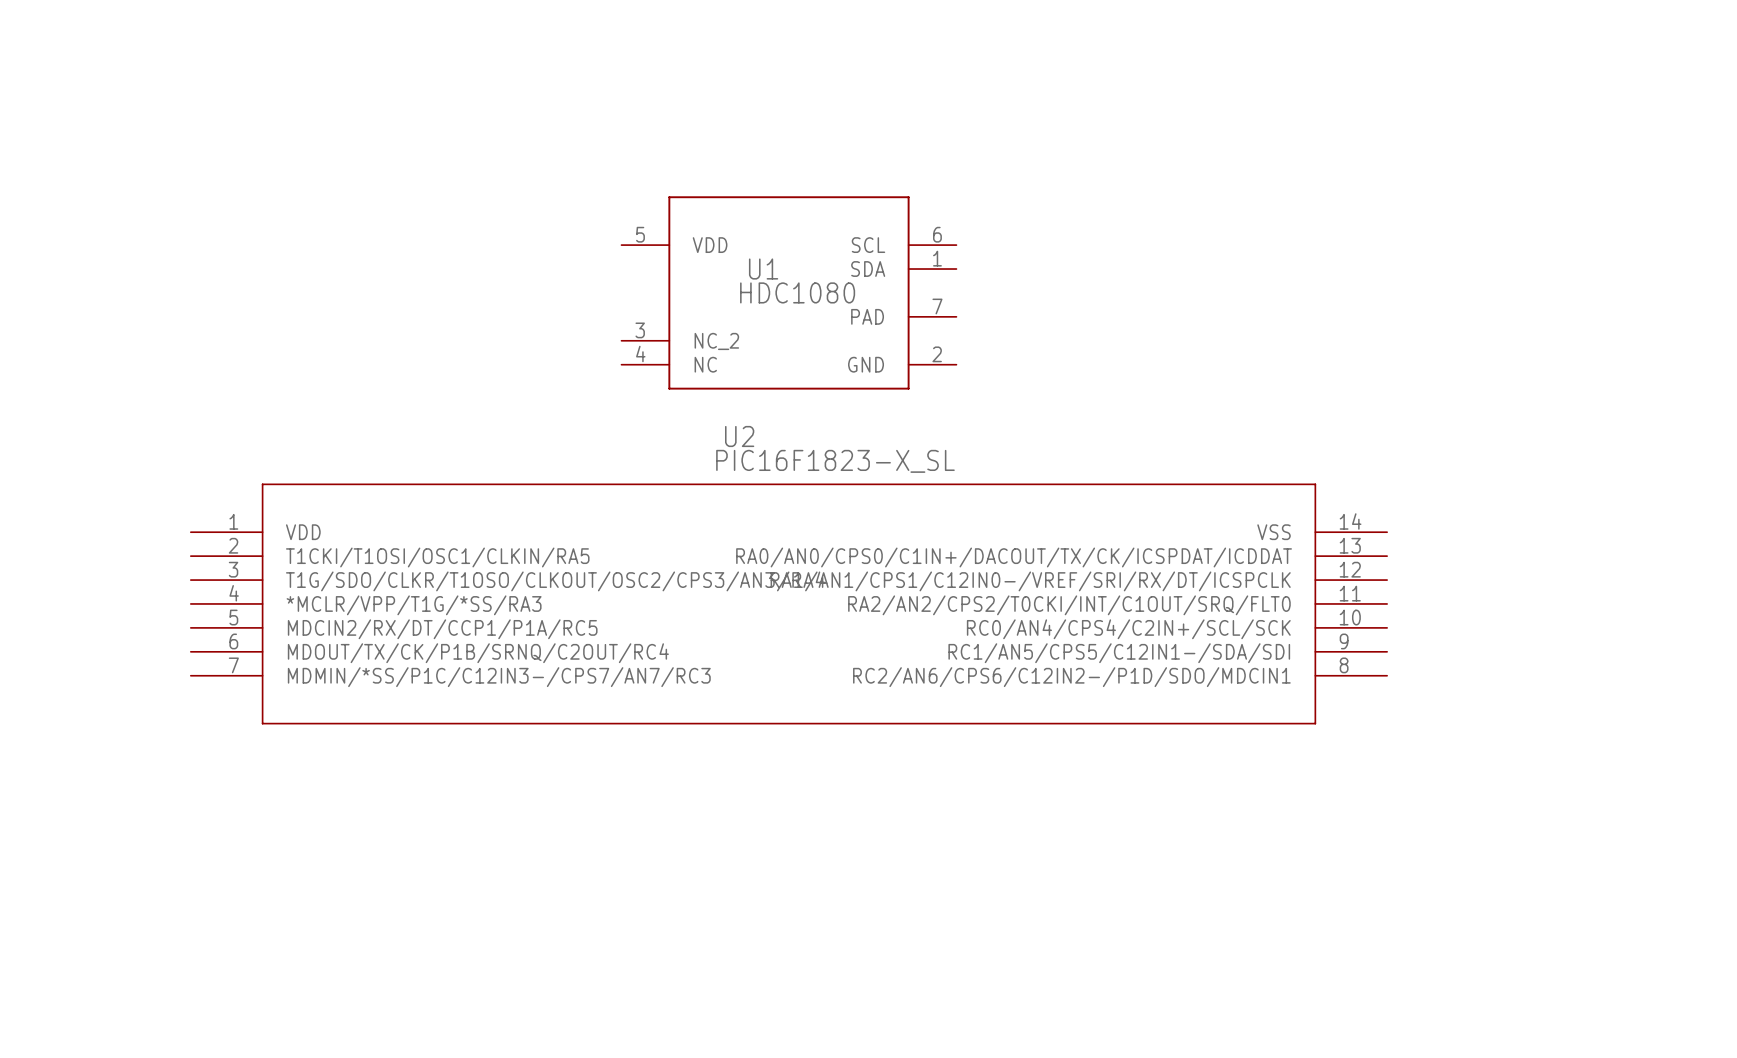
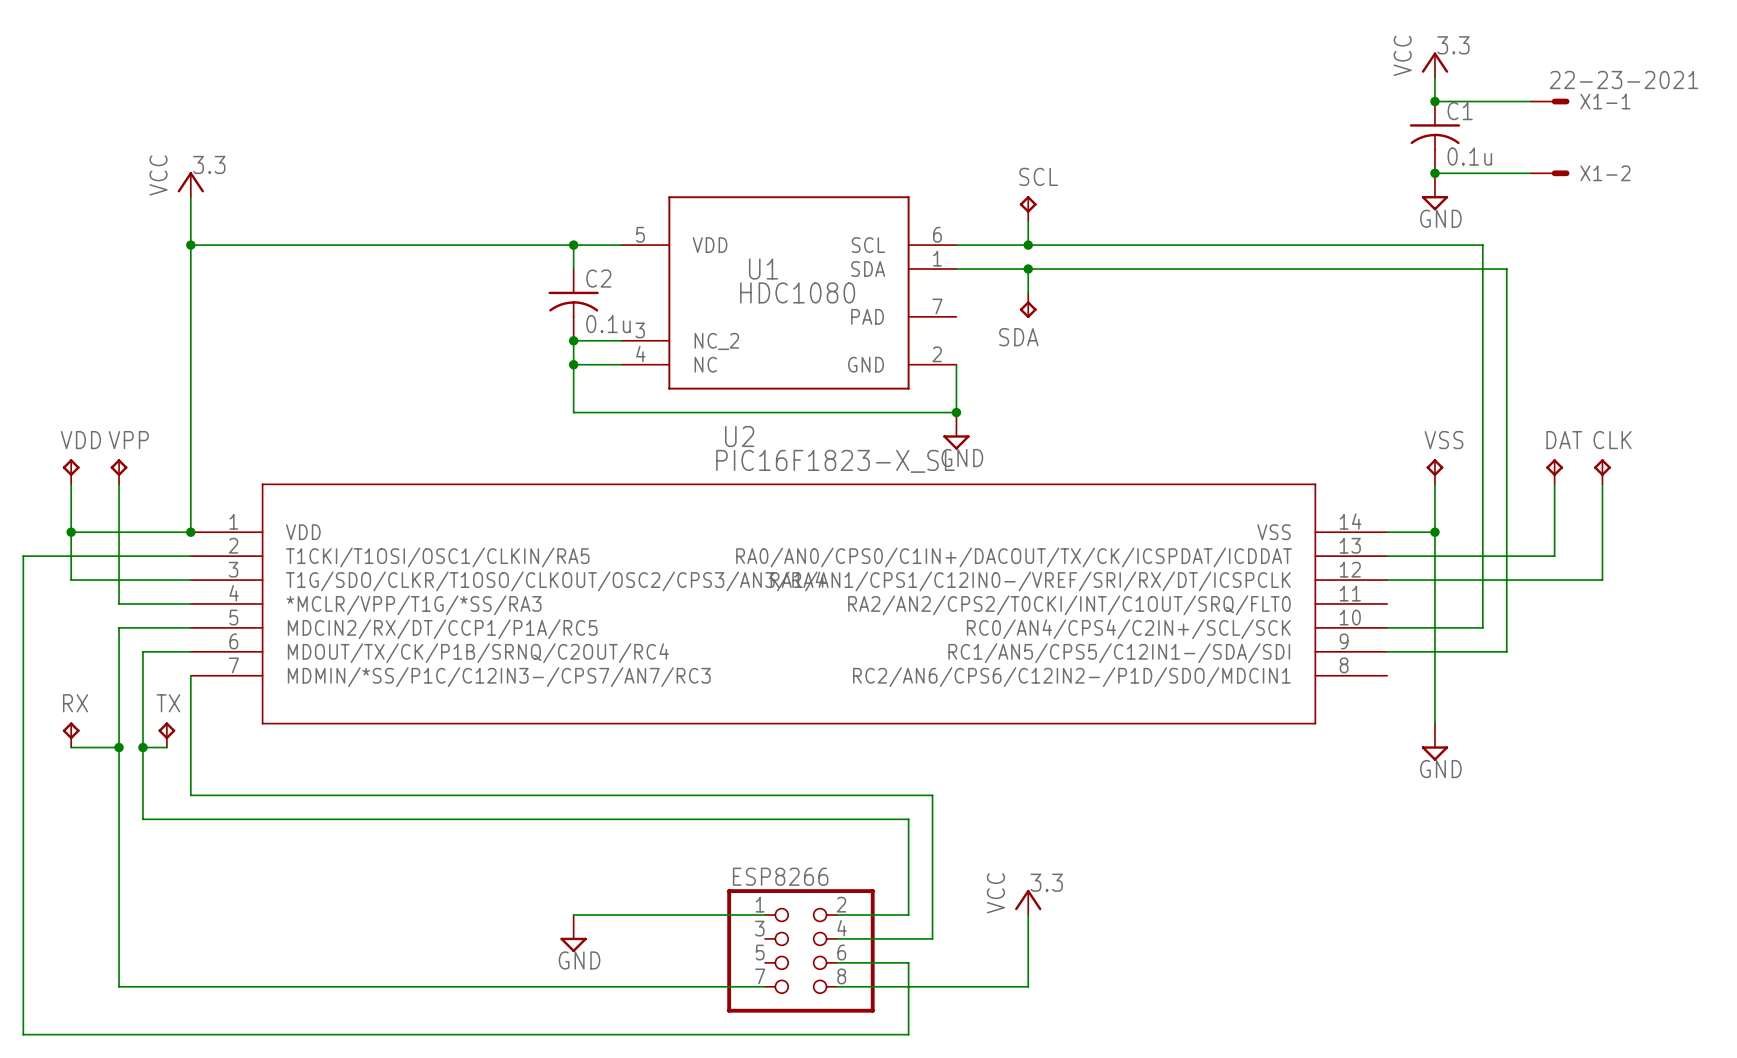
power symbol: none -> VCC (1434, 65)
wire: none -> (1434, 77) (1434, 101) (1530, 101)
junction: none -> (1434, 101)
X1-1: none -> 22-23-2021 (1550, 101)
C1: none -> 0.1u (1434, 137)
wire: none -> (1434, 173) (1530, 173)
junction: none -> (1434, 173)
X1-2: none -> (1550, 173)
power symbol: none -> VCC (190, 184)
power symbol: none -> GND (1434, 191)
wire: none -> (190, 197) (190, 532) (71, 532)
SCL: none -> (1028, 208)
wire: none -> (1028, 221) (1028, 245)
wire: none -> (190, 245) (621, 245)
junction: none -> (190, 245)
wire: none -> (573, 245) (573, 269)
junction: none -> (573, 245)
wire: none -> (956, 245) (1482, 245) (1482, 627) (1387, 627)
junction: none -> (1028, 245)
wire: none -> (956, 269) (1506, 269) (1506, 651) (1387, 651)
wire: none -> (1028, 269) (1028, 292)
junction: none -> (1028, 269)
C2: none -> 0.1u (573, 304)
SDA: none -> (1028, 305)
junction: none -> (573, 340)
wire: none -> (621, 340) (573, 340) (573, 412) (956, 412) (956, 364)
wire: none -> (573, 364) (621, 364)
junction: none -> (573, 364)
junction: none -> (956, 412)
power symbol: none -> GND (956, 431)
VDD: none -> (71, 471)
VPP: none -> (119, 471)
VSS: none -> (1434, 471)
DAT: none -> (1554, 471)
CLK: none -> (1602, 471)
wire: none -> (71, 484) (71, 580) (190, 580)
wire: none -> (119, 484) (119, 603) (190, 603)
wire: none -> (1434, 484) (1434, 723)
wire: none -> (1554, 484) (1554, 556) (1387, 556)
wire: none -> (1602, 484) (1602, 580) (1387, 580)
junction: none -> (71, 532)
junction: none -> (190, 532)
wire: none -> (1387, 532) (1434, 532)
junction: none -> (1434, 532)
wire: none -> (190, 556) (23, 556) (23, 1034) (908, 1034) (908, 962) (836, 962)
wire: none -> (190, 627) (119, 627) (119, 986) (765, 986)
wire: none -> (190, 651) (142, 651) (142, 819) (908, 819) (908, 915) (836, 915)
wire: none -> (190, 675) (190, 795) (932, 795) (932, 938) (836, 938)
RX: none -> (71, 734)
TX: none -> (166, 734)
power symbol: none -> GND (1434, 742)
wire: none -> (71, 747) (119, 747)
junction: none -> (119, 747)
wire: none -> (142, 747) (166, 747)
junction: none -> (142, 747)
power symbol: none -> VCC (1028, 902)
wire: none -> (573, 915) (765, 915)
wire: none -> (1028, 915) (1028, 986) (836, 986)
power symbol: none -> GND (573, 933)
ESP8266: none -> (800, 950)

